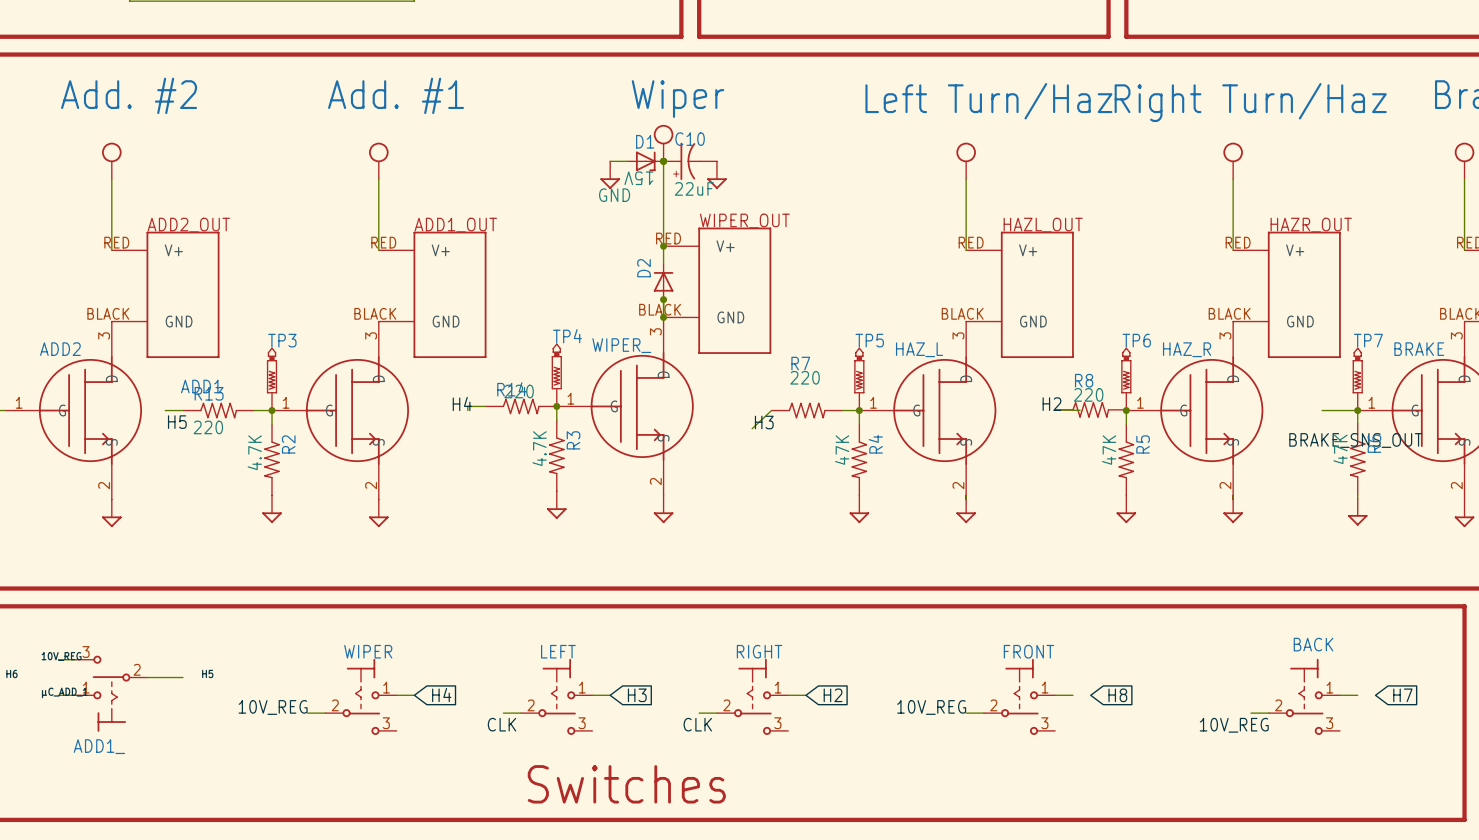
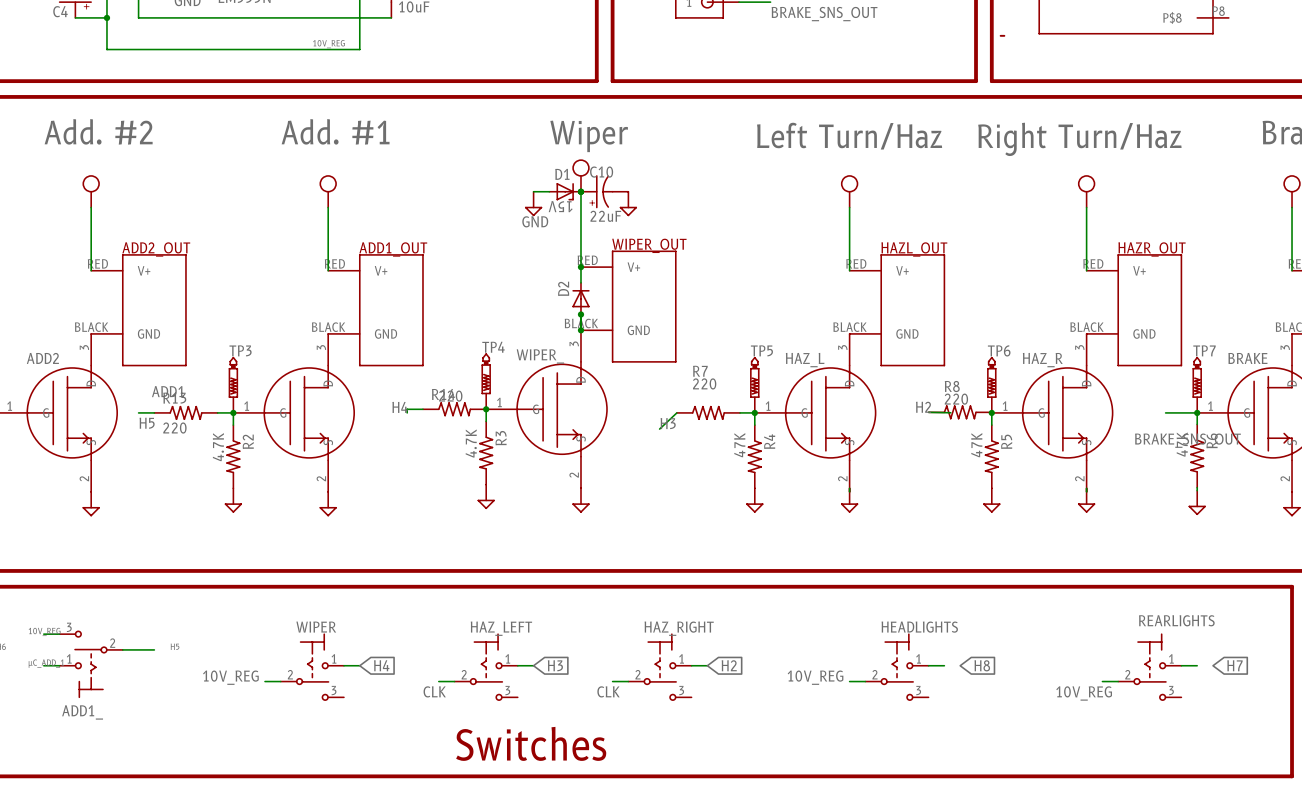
BACK name: BACK (1313, 644) -> REARLIGHTS (1176, 620)
LEFT name: LEFT (558, 651) -> HAZ_LEFT (501, 628)
RIGHT name: RIGHT (759, 651) -> HAZ_RIGHT (679, 628)
FRONT name: FRONT (1028, 651) -> HEADLIGHTS (919, 627)

